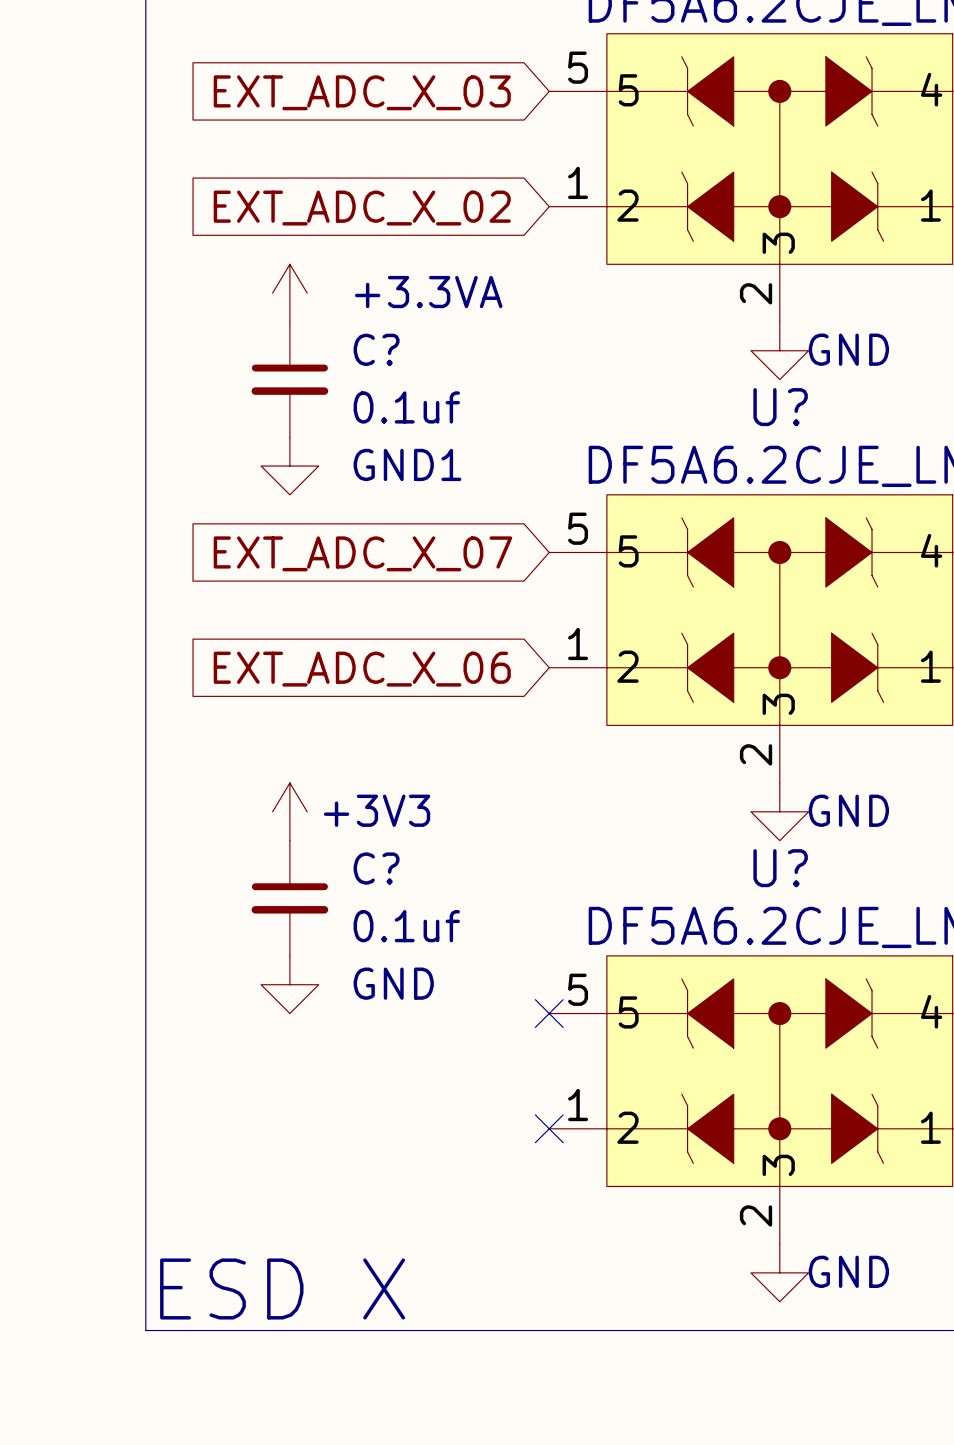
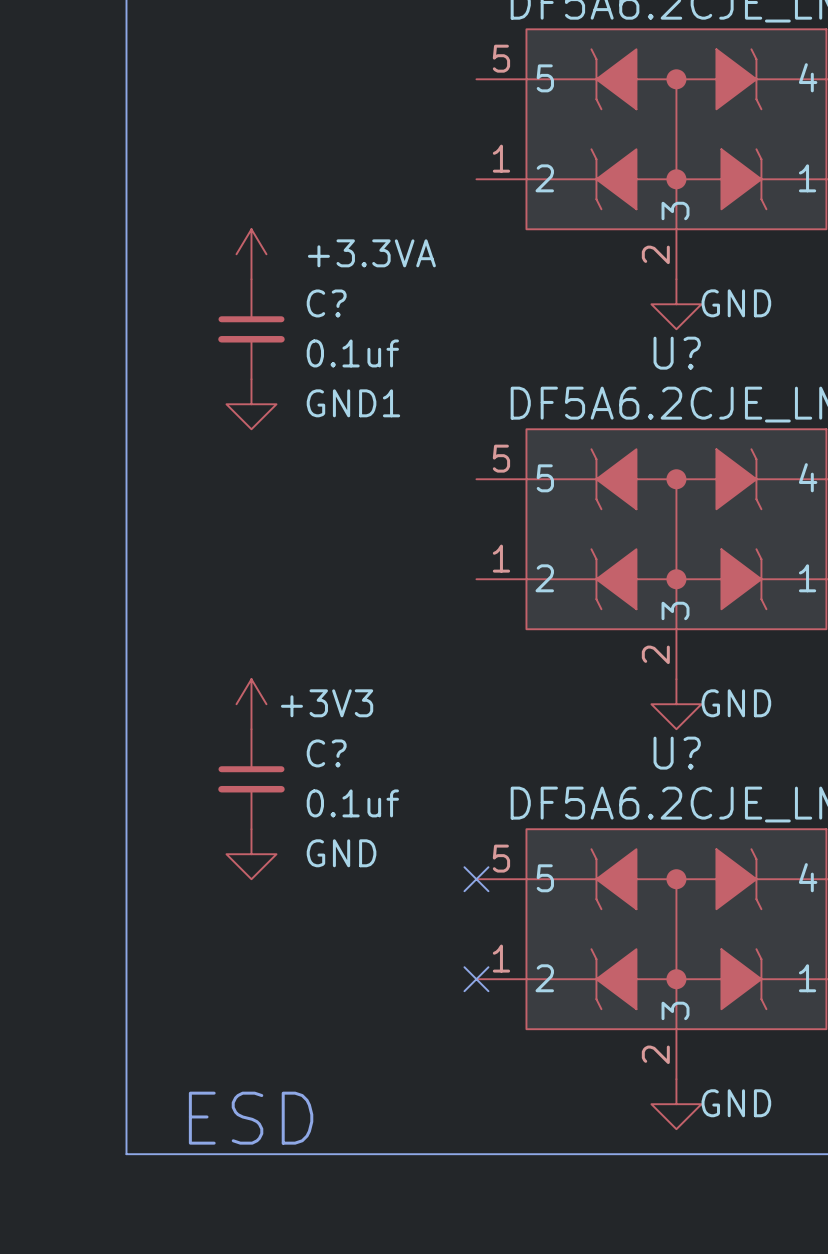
global label: EXT_ADC_X_03 (362, 92) -> none
global label: EXT_ADC_X_02 (362, 208) -> none
global label: EXT_ADC_X_07 (362, 553) -> none
global label: EXT_ADC_X_06 (362, 669) -> none
text: ESD X (282, 1288) -> ESD (251, 1118)

